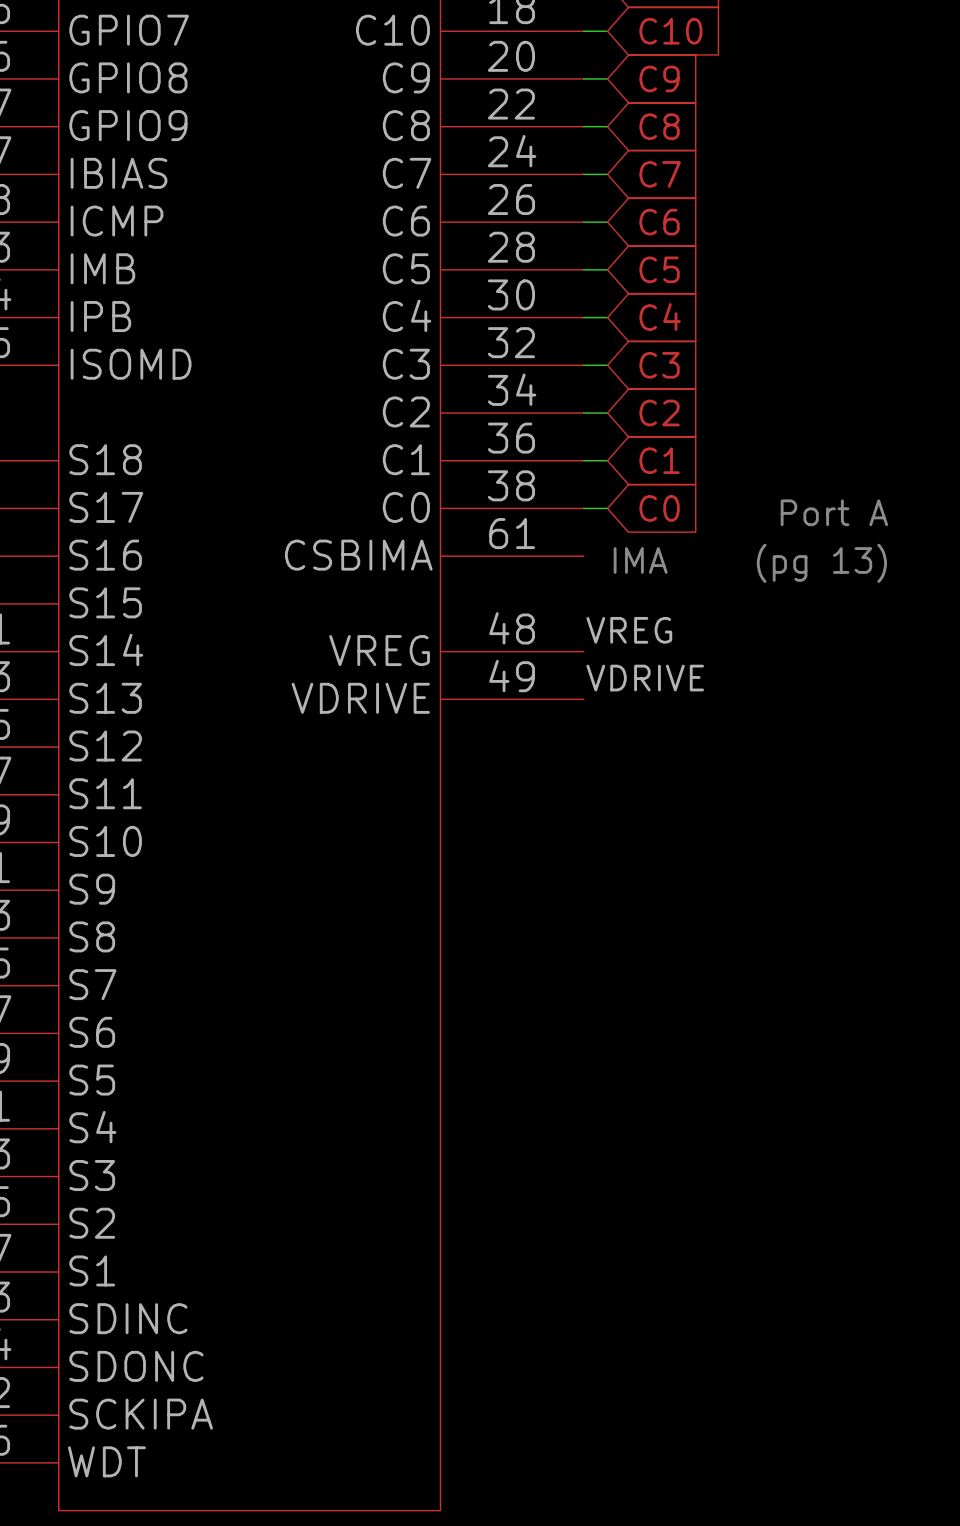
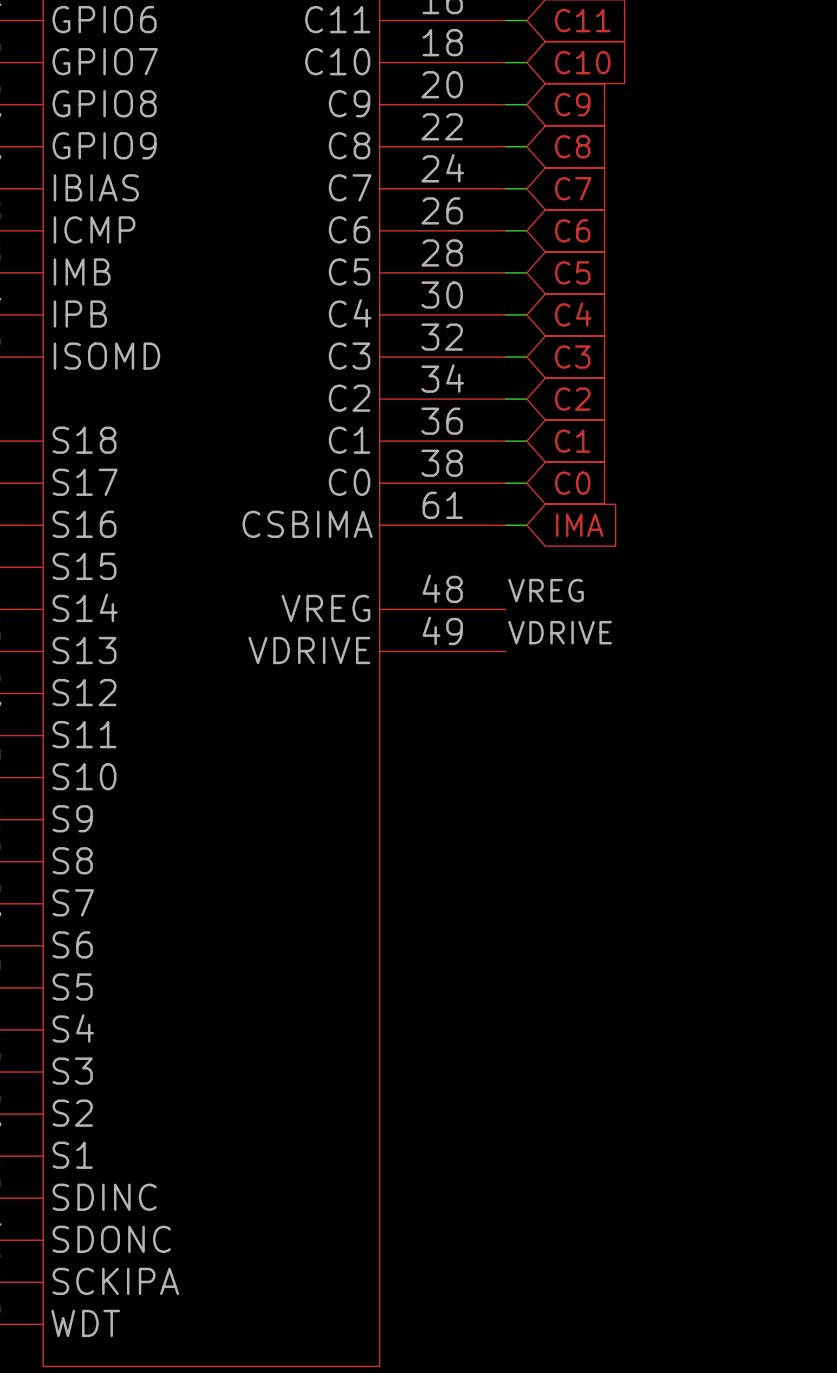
text: Port A (834, 512) -> none
wire: none -> (505, 525) (526, 525)
global label: none -> IMA (579, 525)
text: IMA (640, 560) -> none
text: (pg 13) (821, 563) -> none

